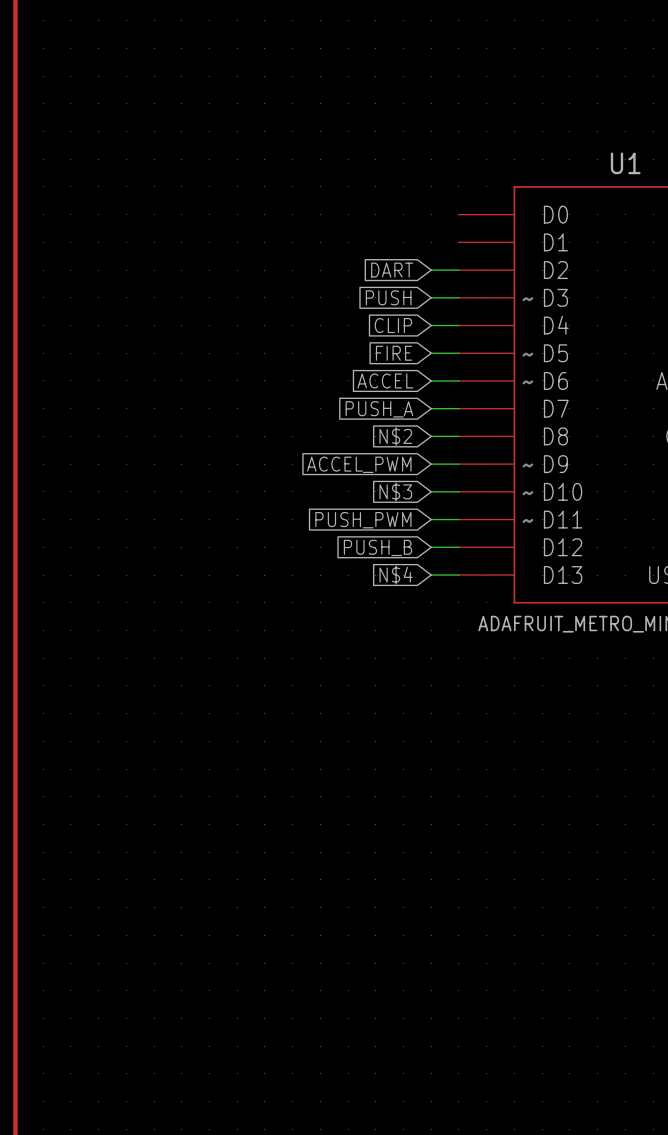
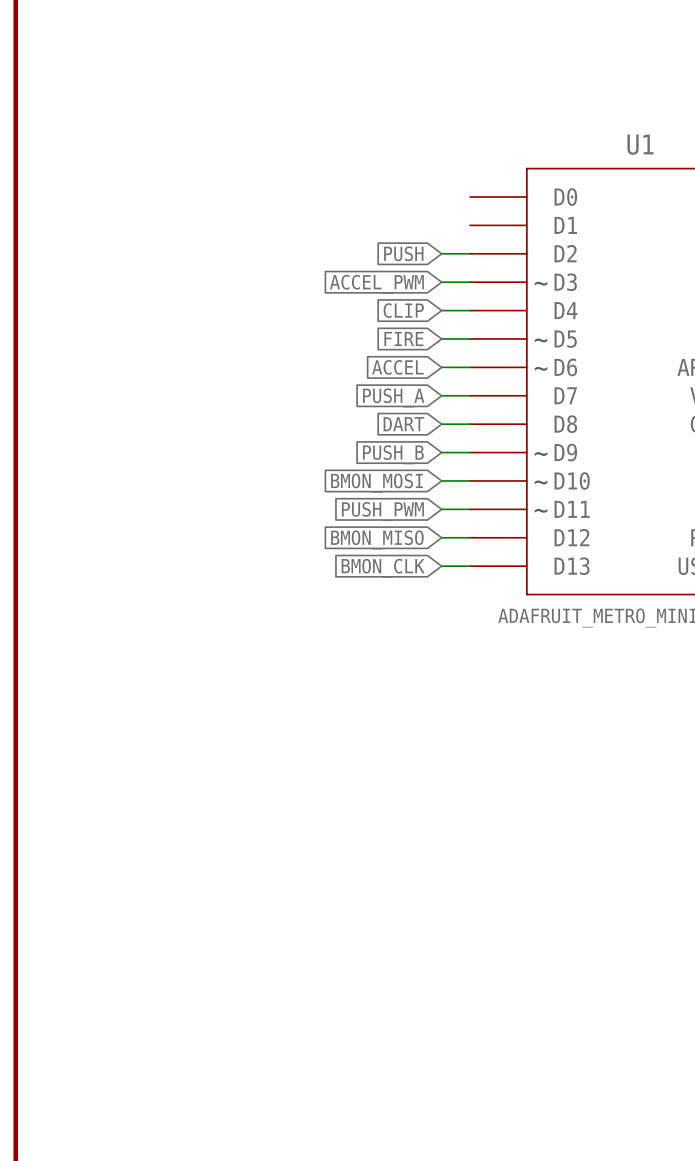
global label: DART (392, 270) -> PUSH (403, 253)
global label: PUSH (388, 297) -> ACCEL_PWM (376, 284)
global label: N$2 (395, 436) -> DART (403, 424)
global label: ACCEL_PWM (359, 464) -> PUSH_B (393, 454)
global label: N$3 (395, 491) -> BMON_MOSI (376, 483)
global label: PUSH_B (377, 547) -> BMON_MISO (377, 539)
global label: N$4 (396, 575) -> BMON_CLK (383, 568)

